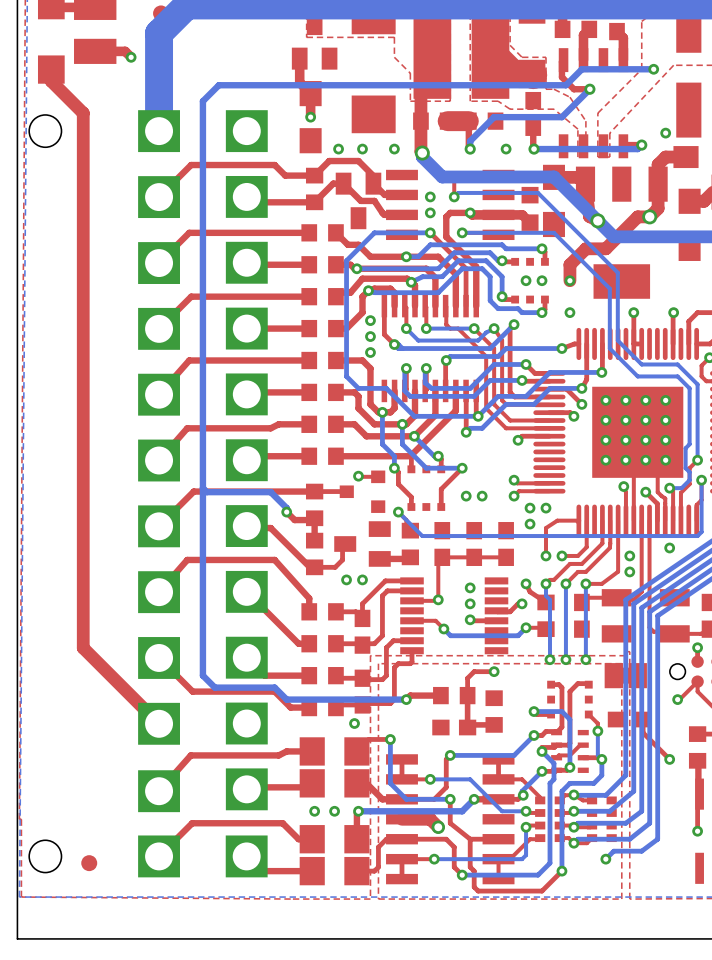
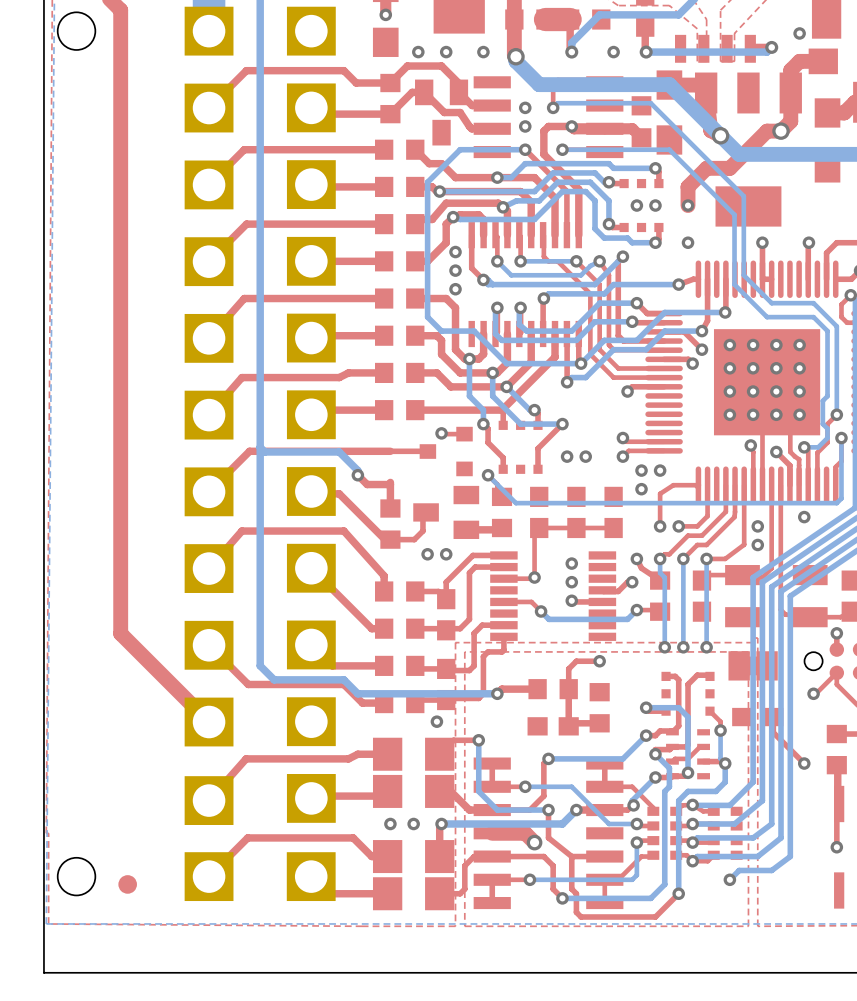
part: (314, 504) -> none

